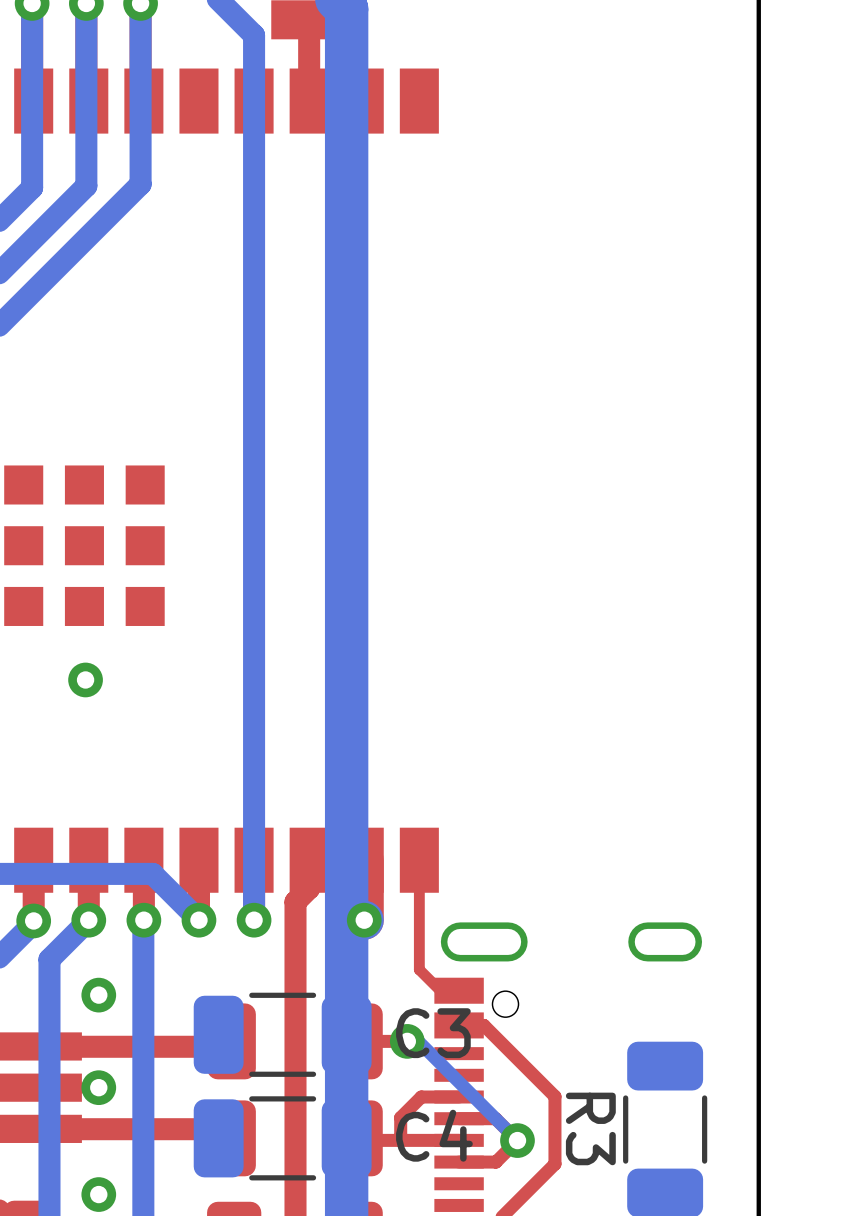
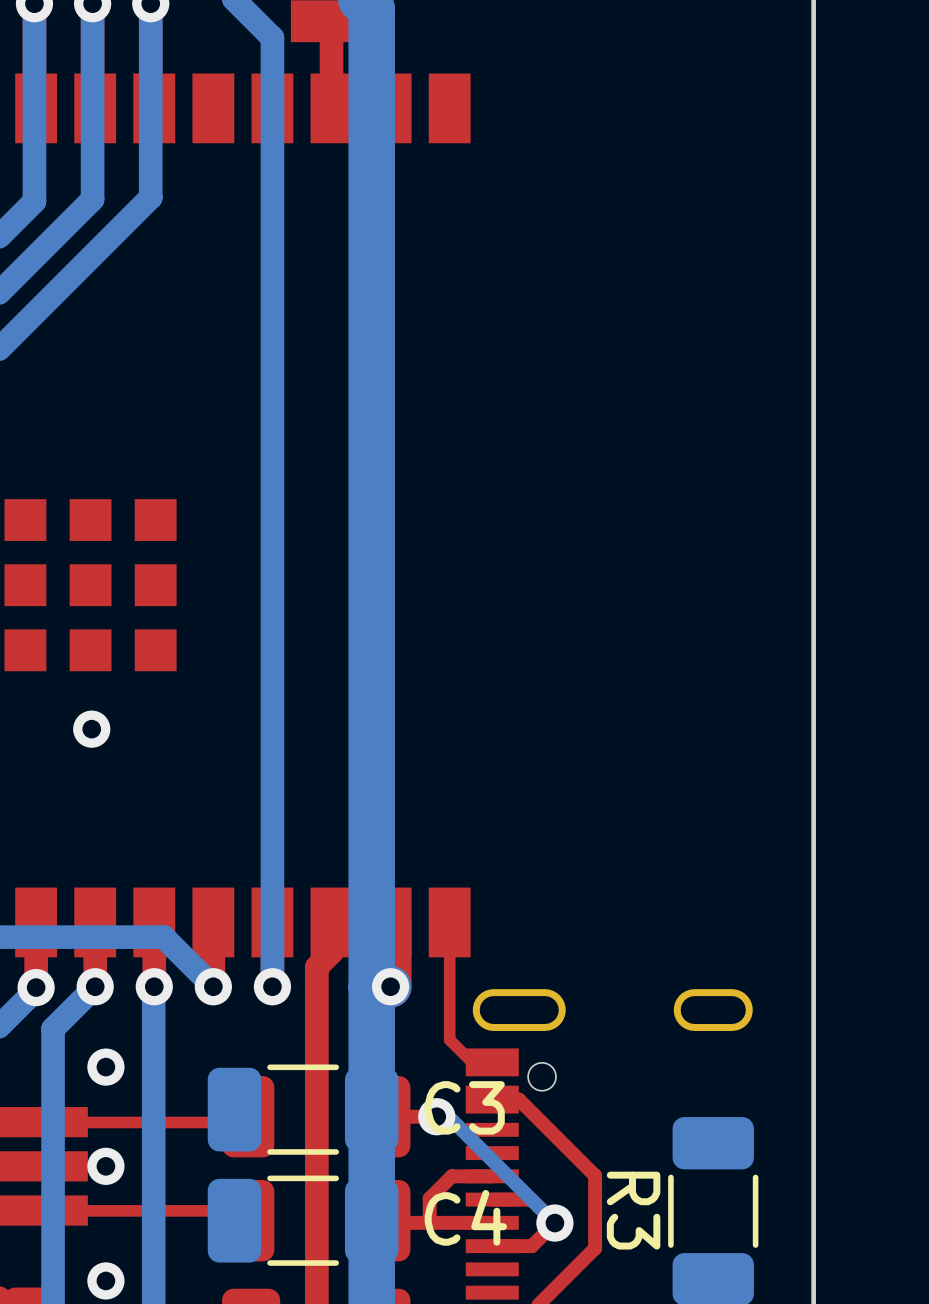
top track width: thick (226, 1046) (32, 1046) -> thin (242, 1122) (34, 1122)
top track width: thick (222, 1129) (32, 1129) -> thin (238, 1210) (34, 1210)

